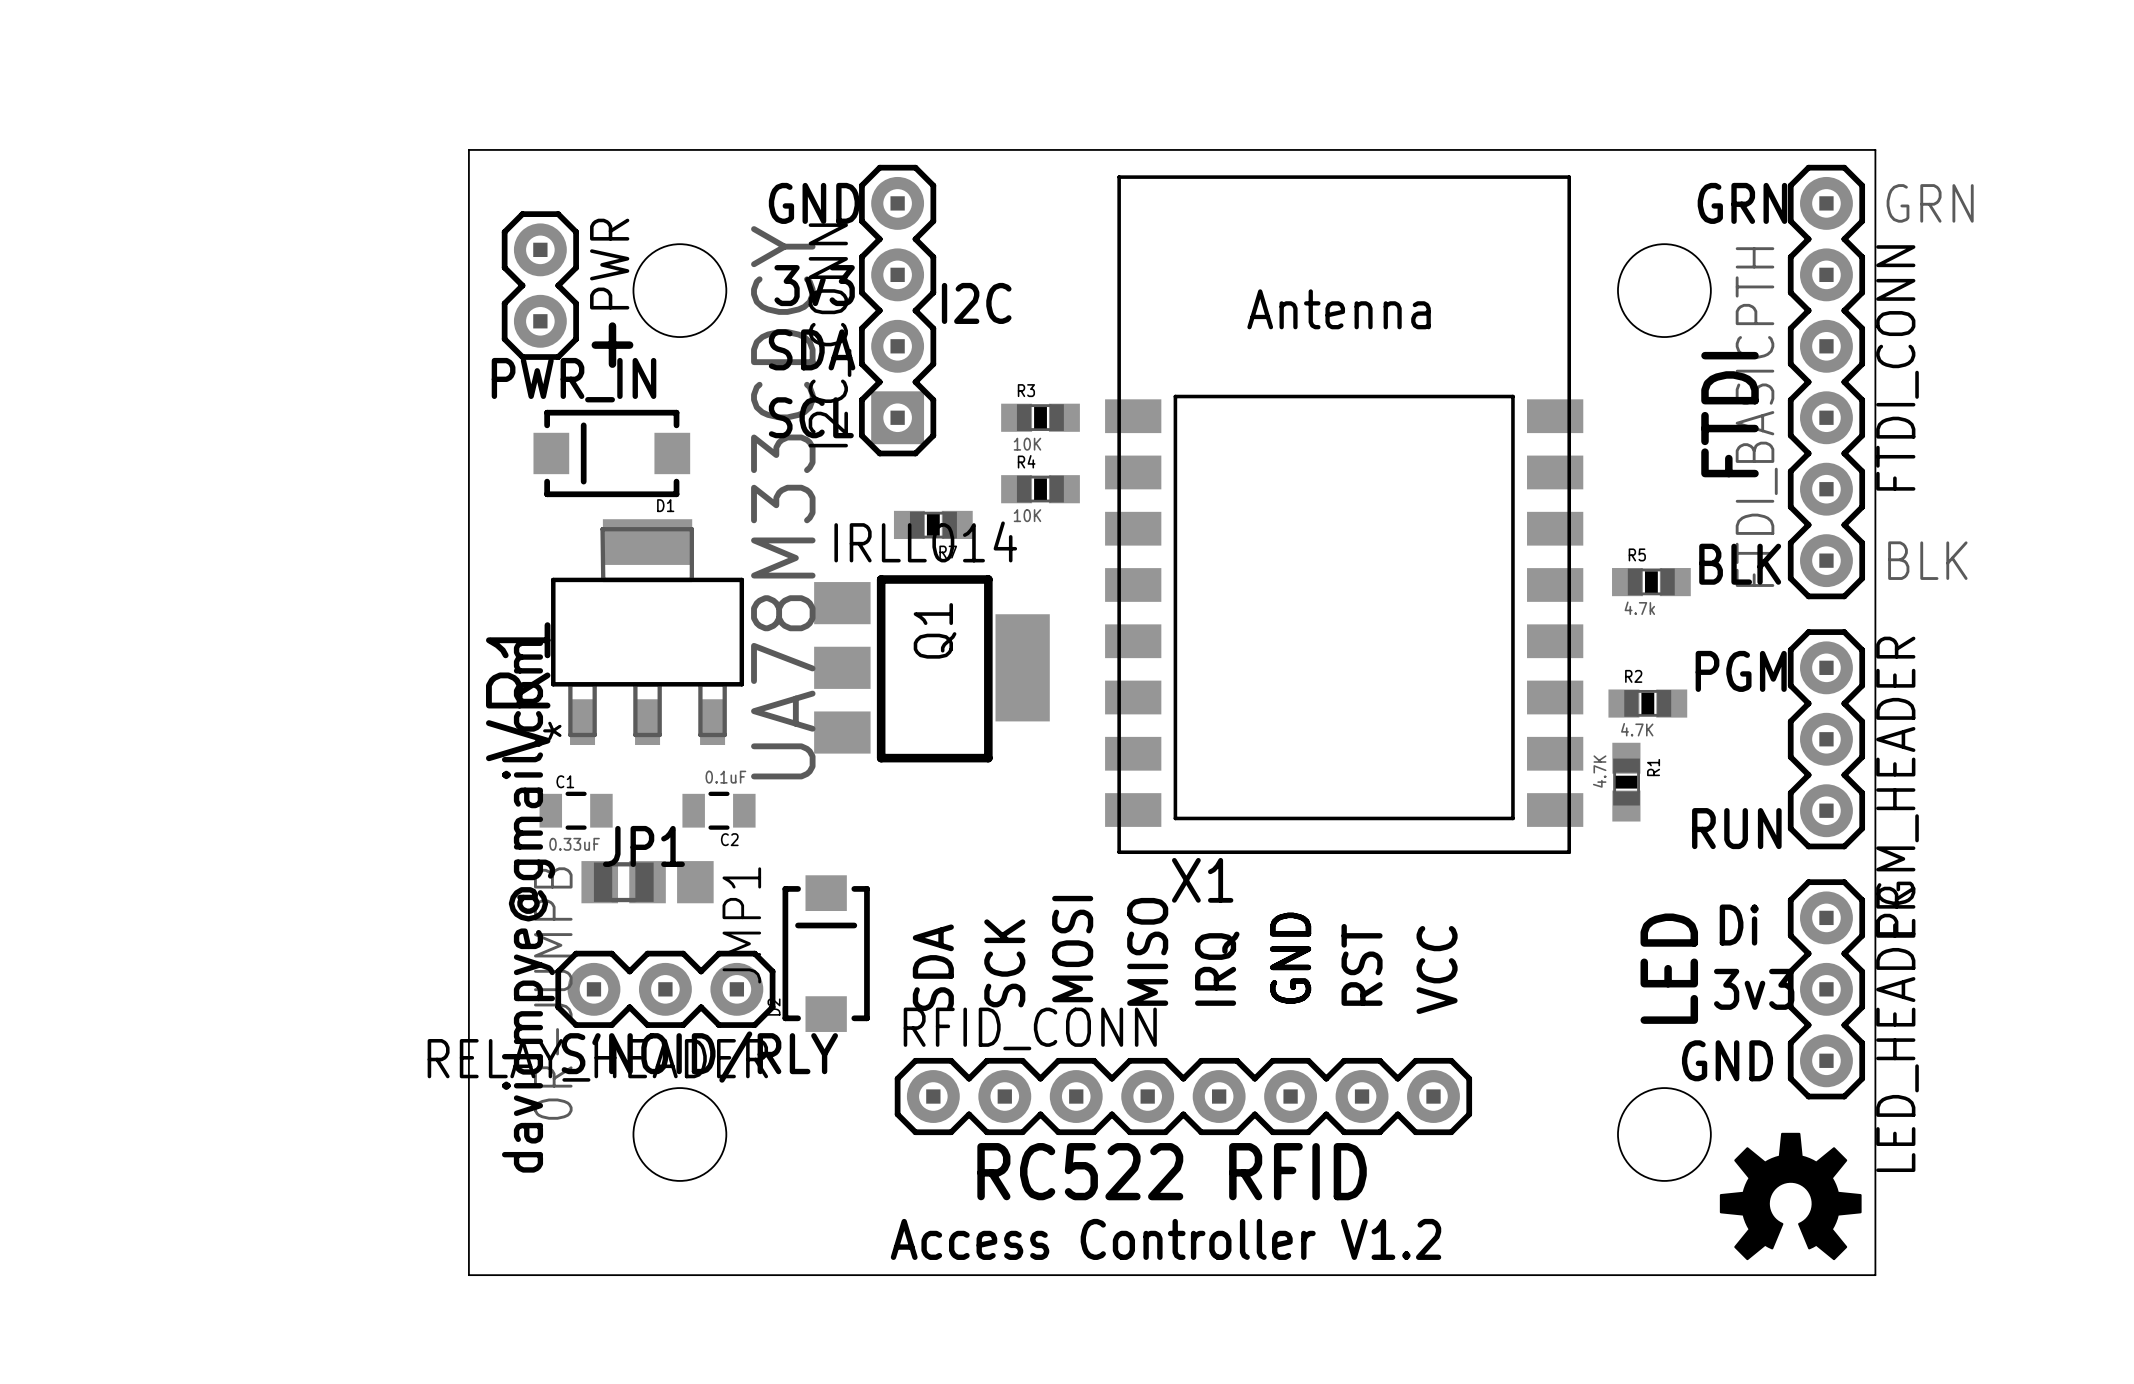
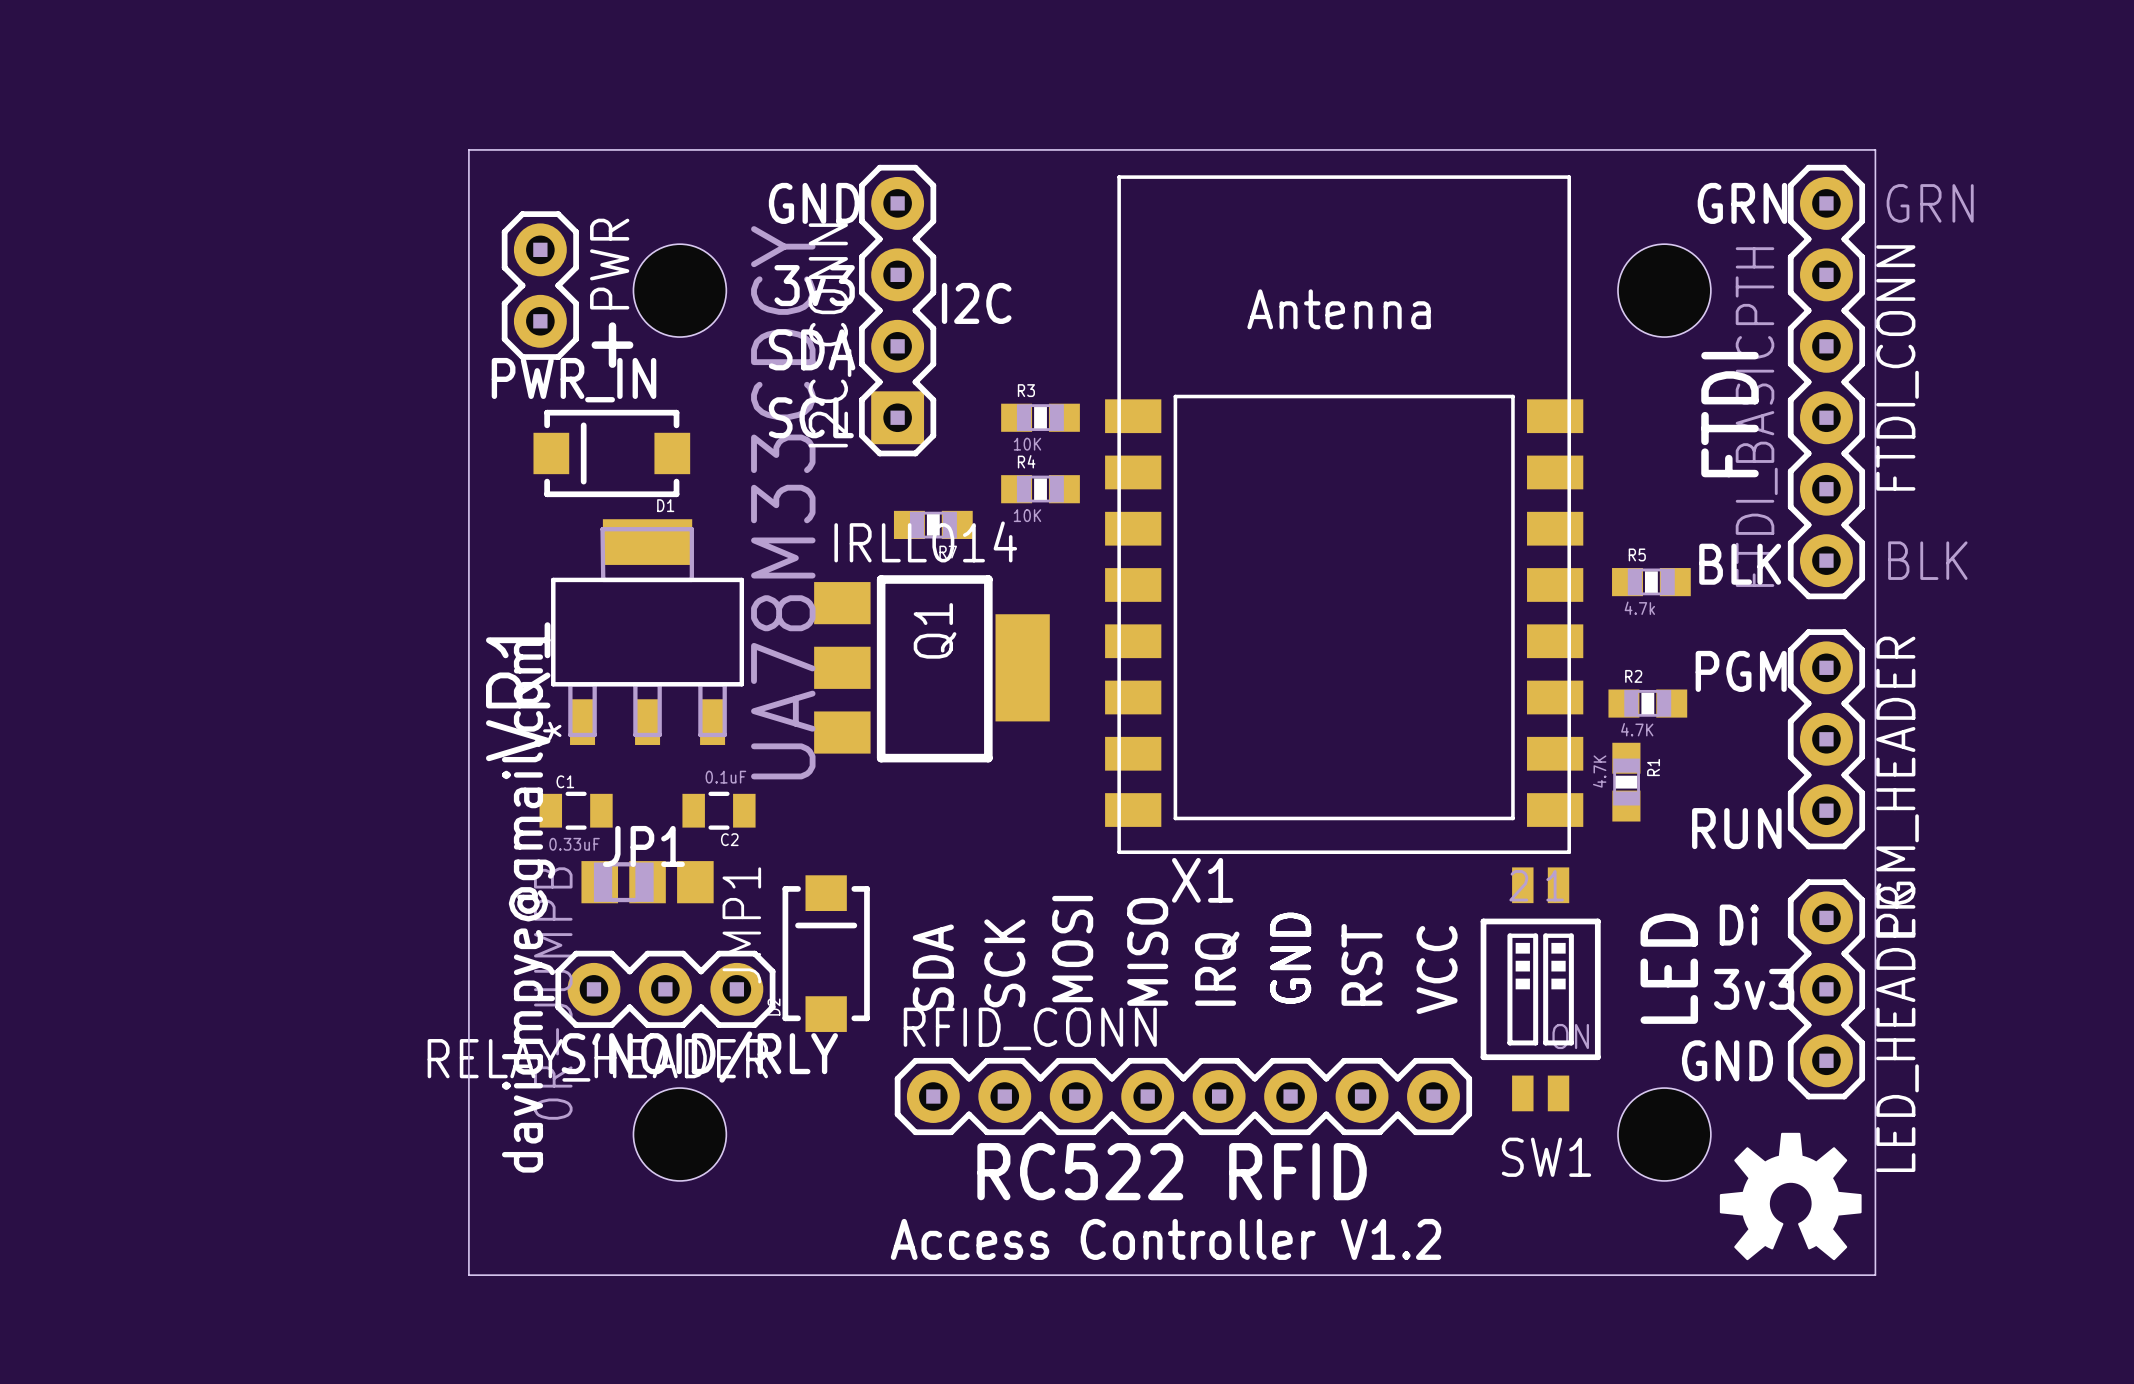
SW1: none -> (1540, 989)

